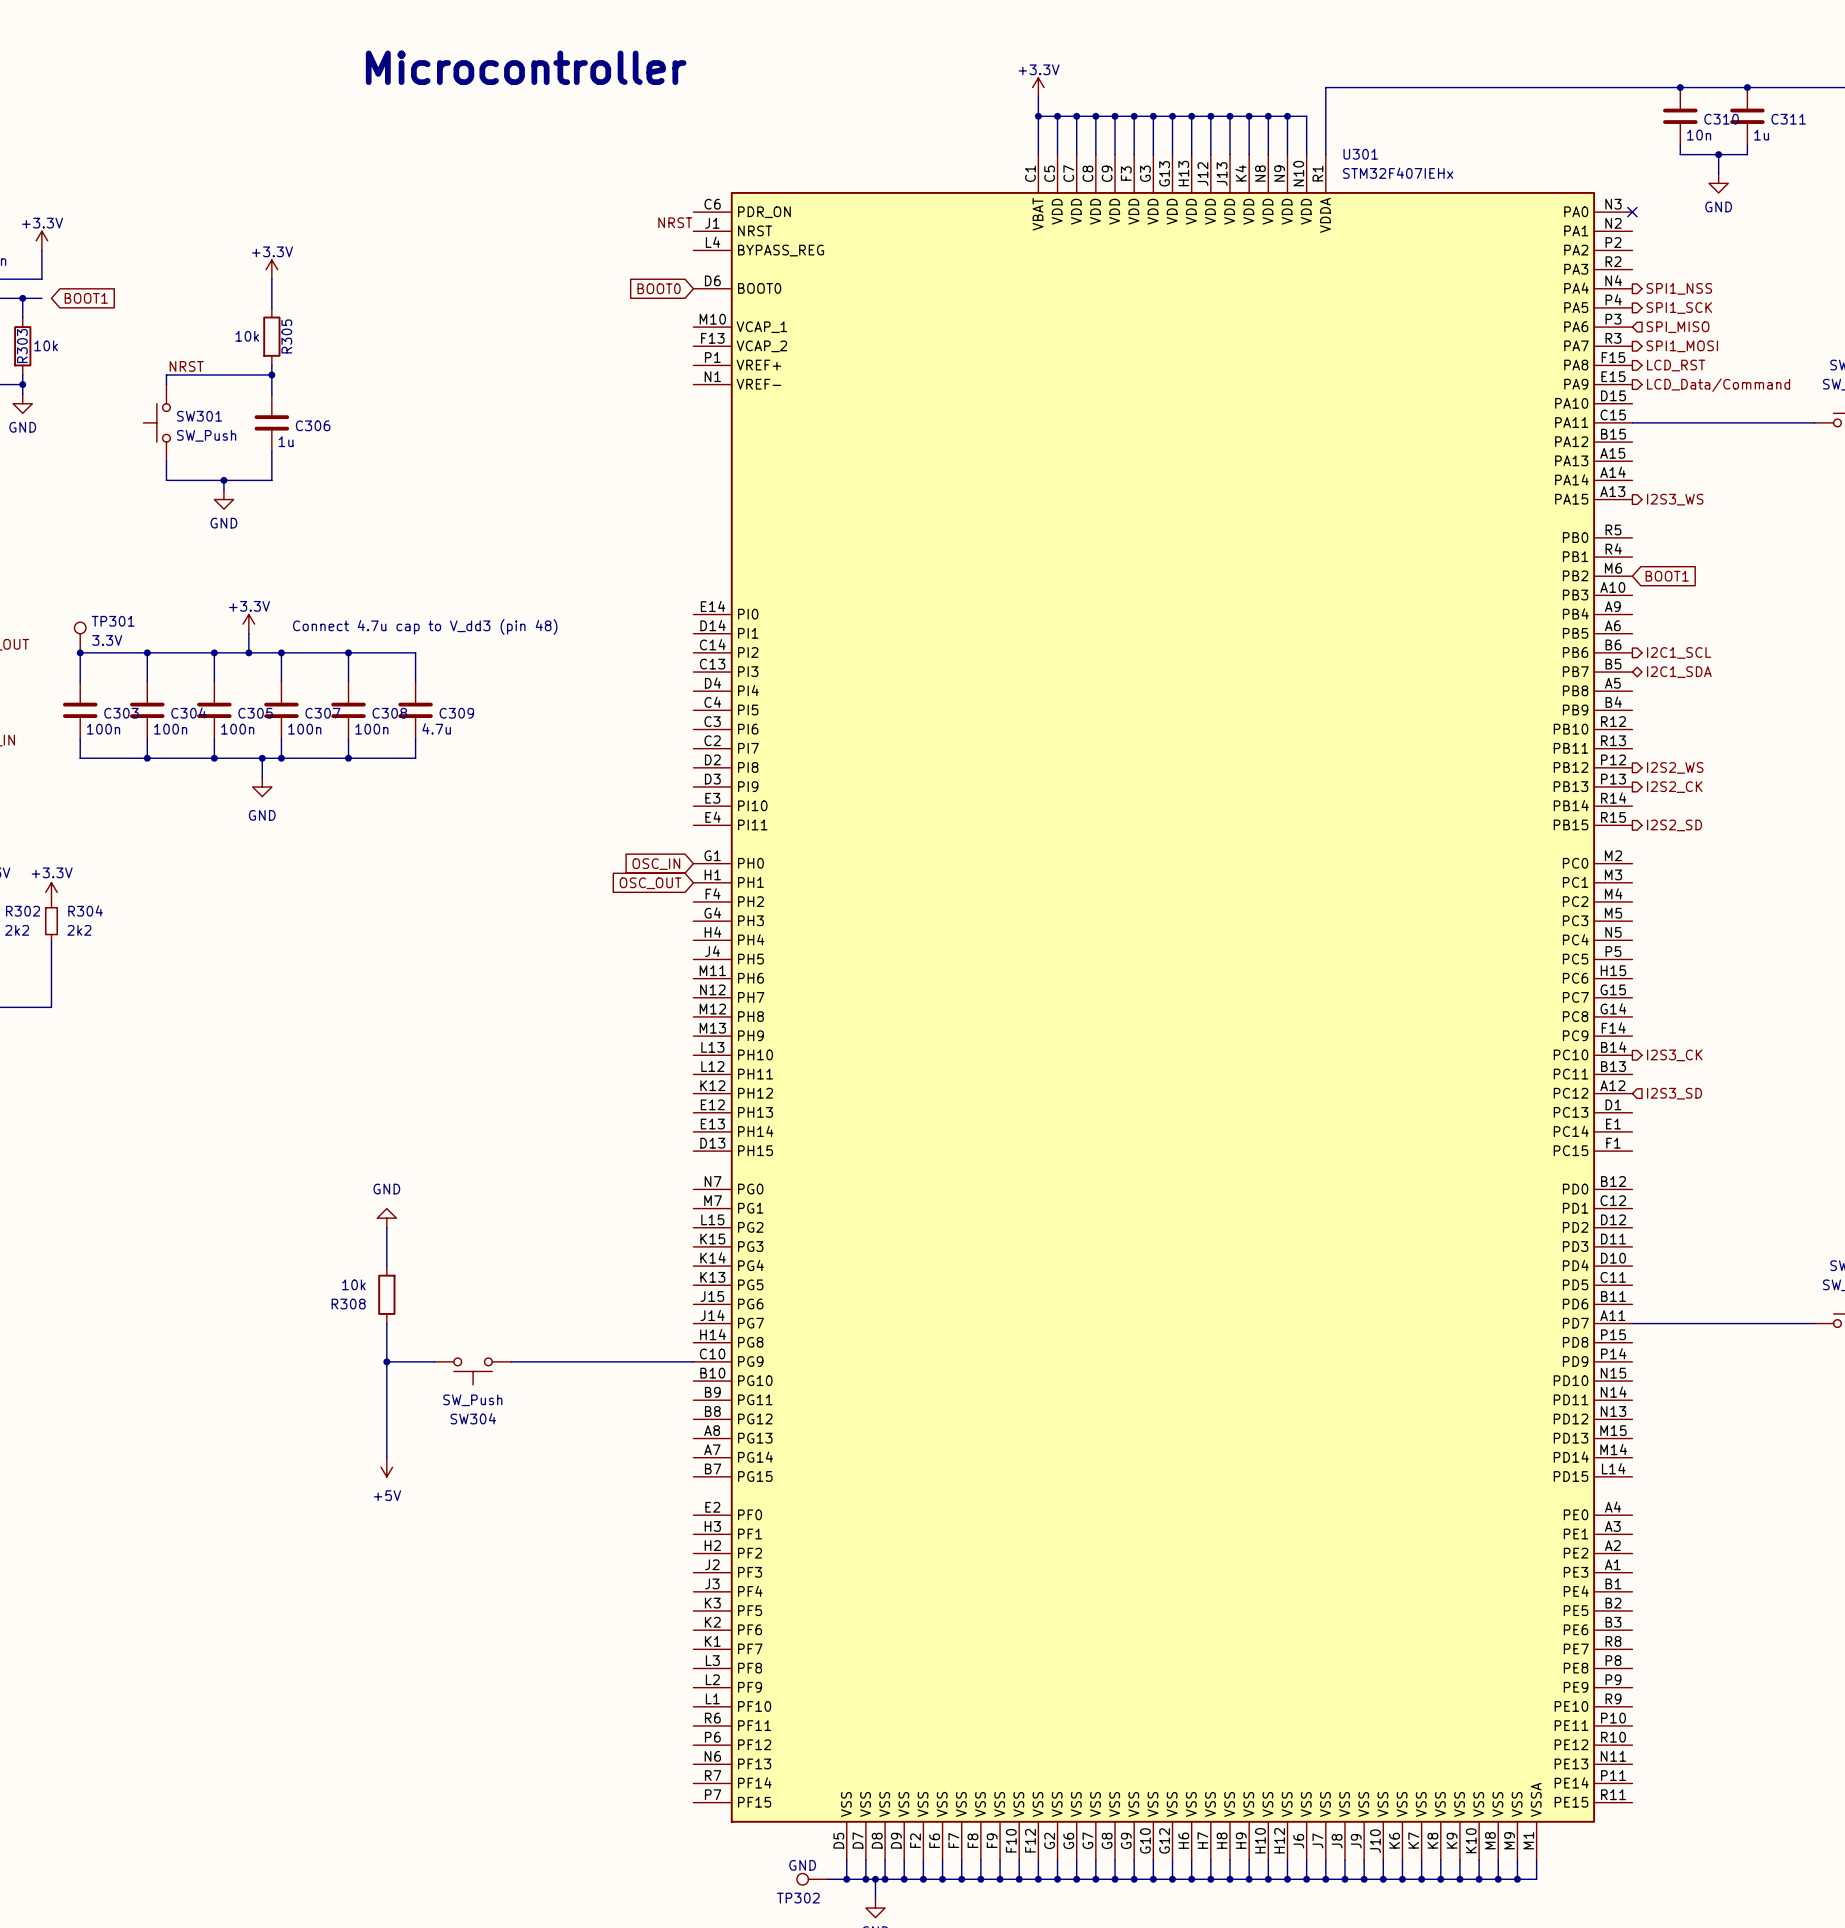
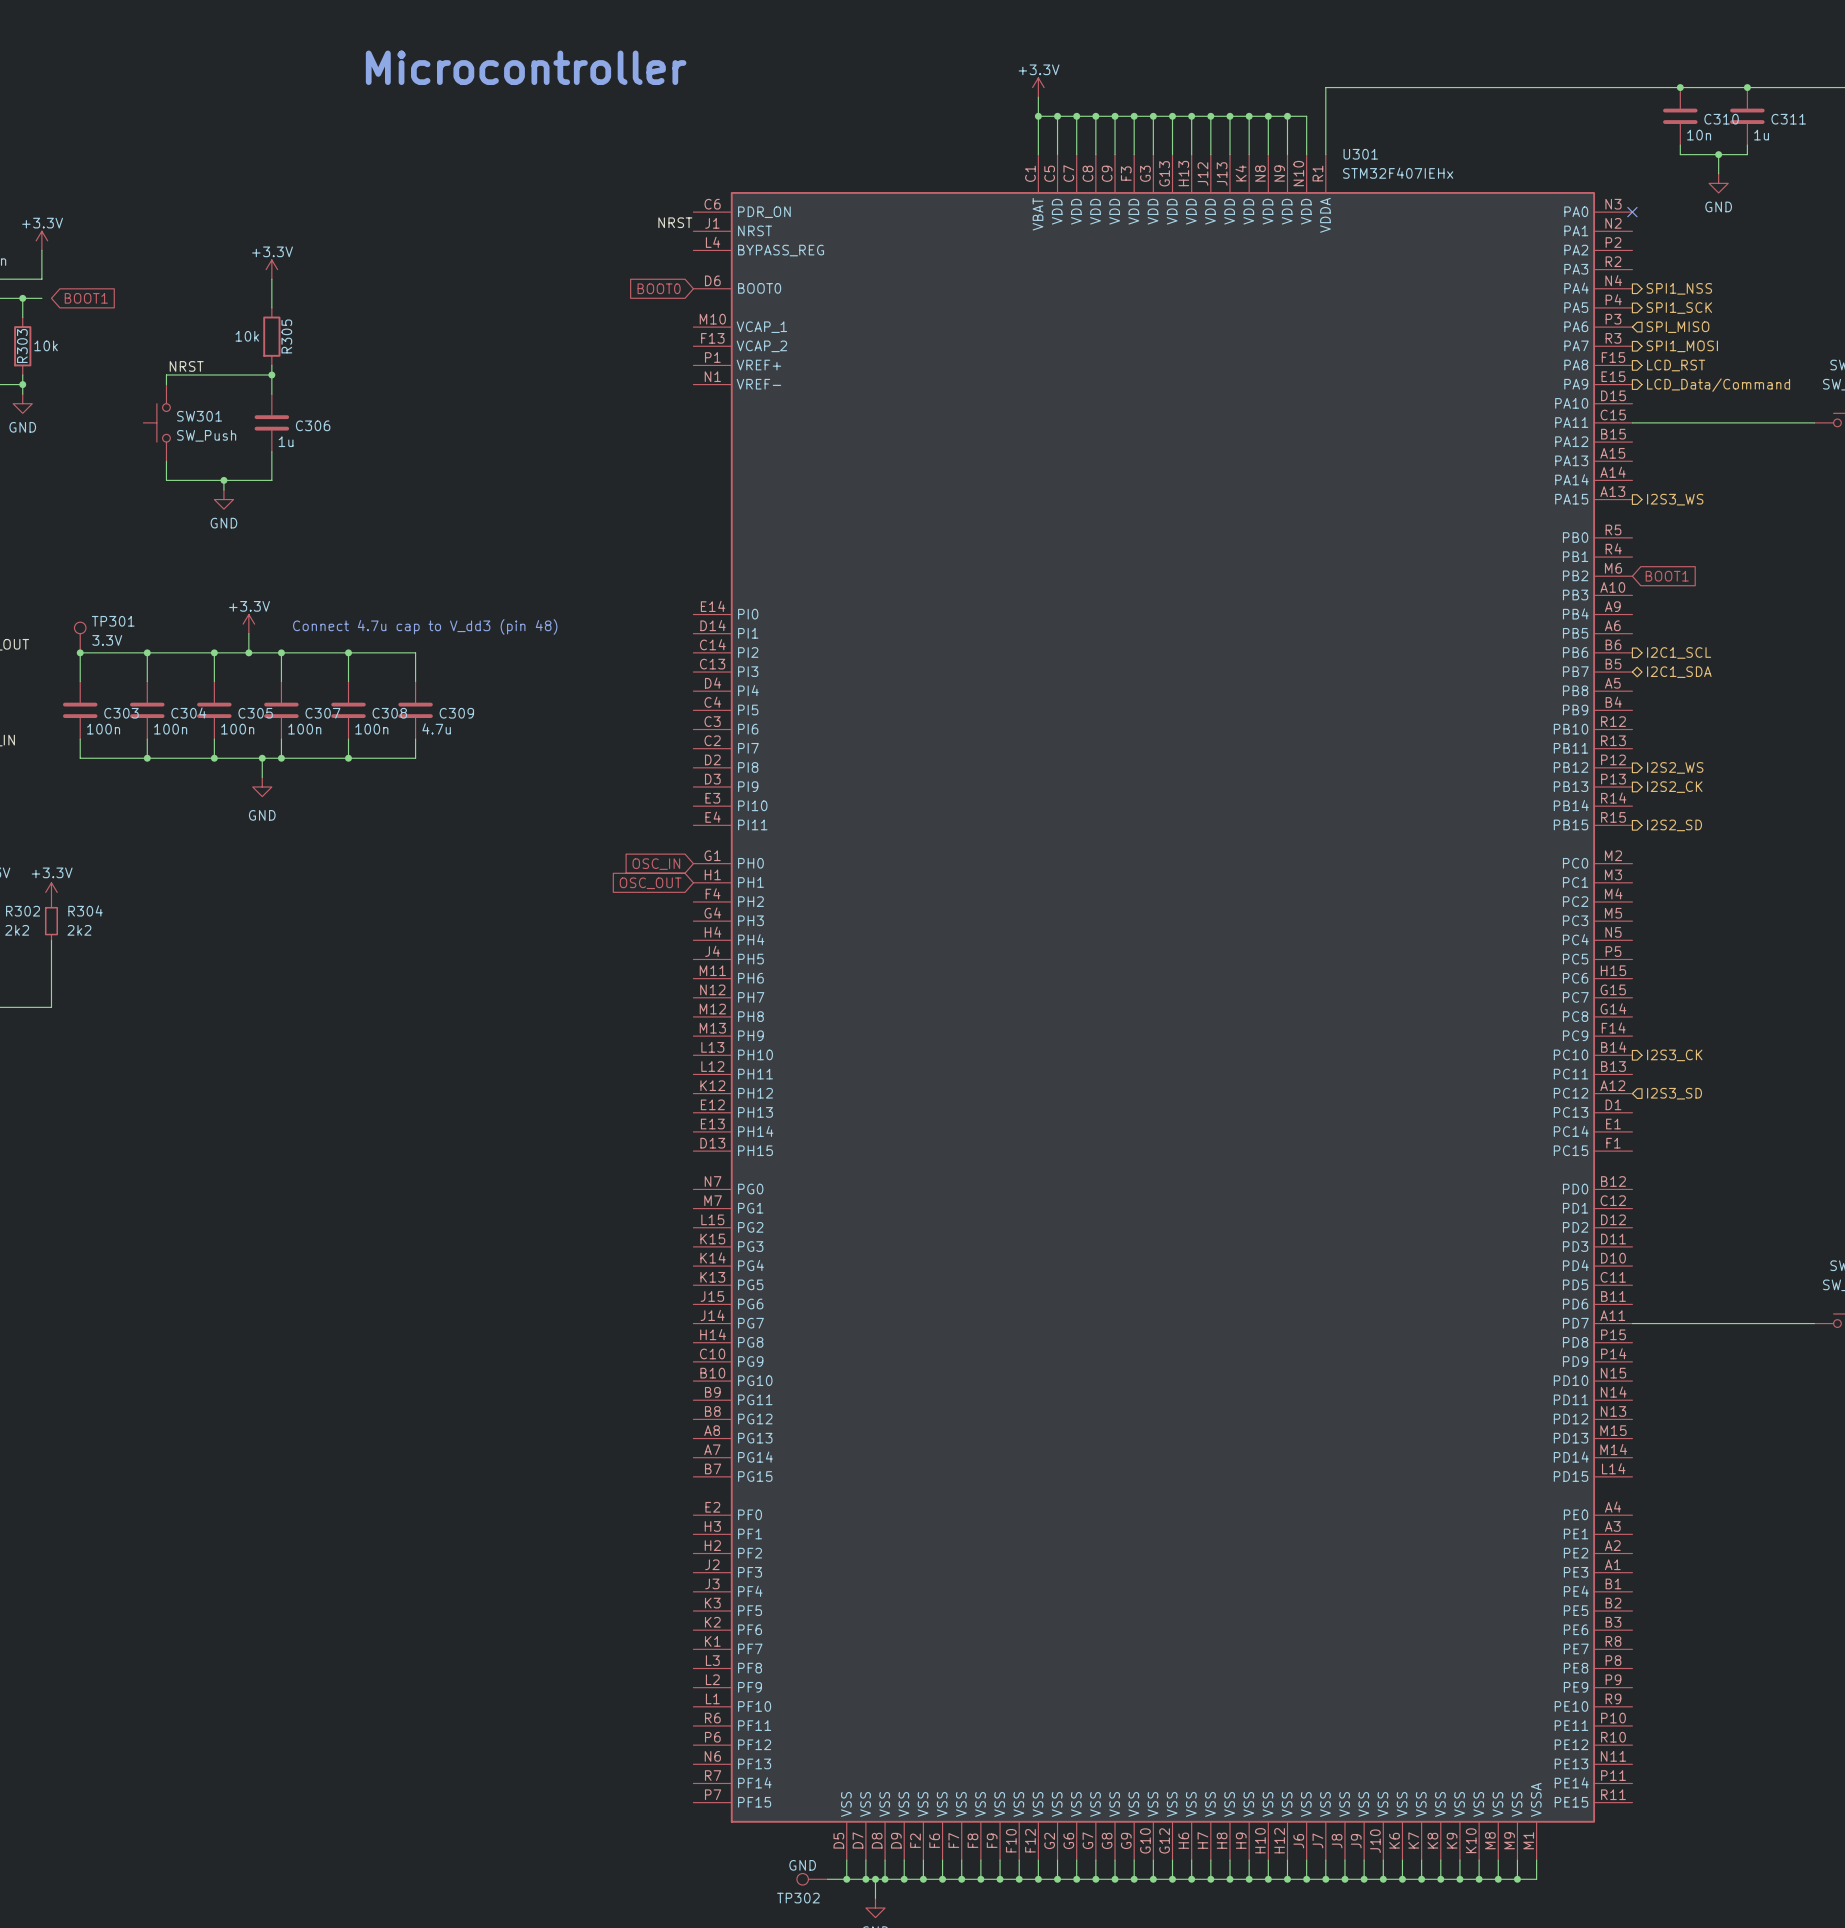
power symbol: GND (386, 1218) -> none
wire: (386, 1227) (386, 1266) -> none
R308: 10k (386, 1294) -> none
wire: (386, 1323) (386, 1457) -> none
wire: (386, 1361) (434, 1361) -> none
junction: (386, 1361) -> none
wire: (511, 1361) (693, 1361) -> none
SW304: SW_Push (473, 1371) -> none
power symbol: +5V (386, 1467) -> none

